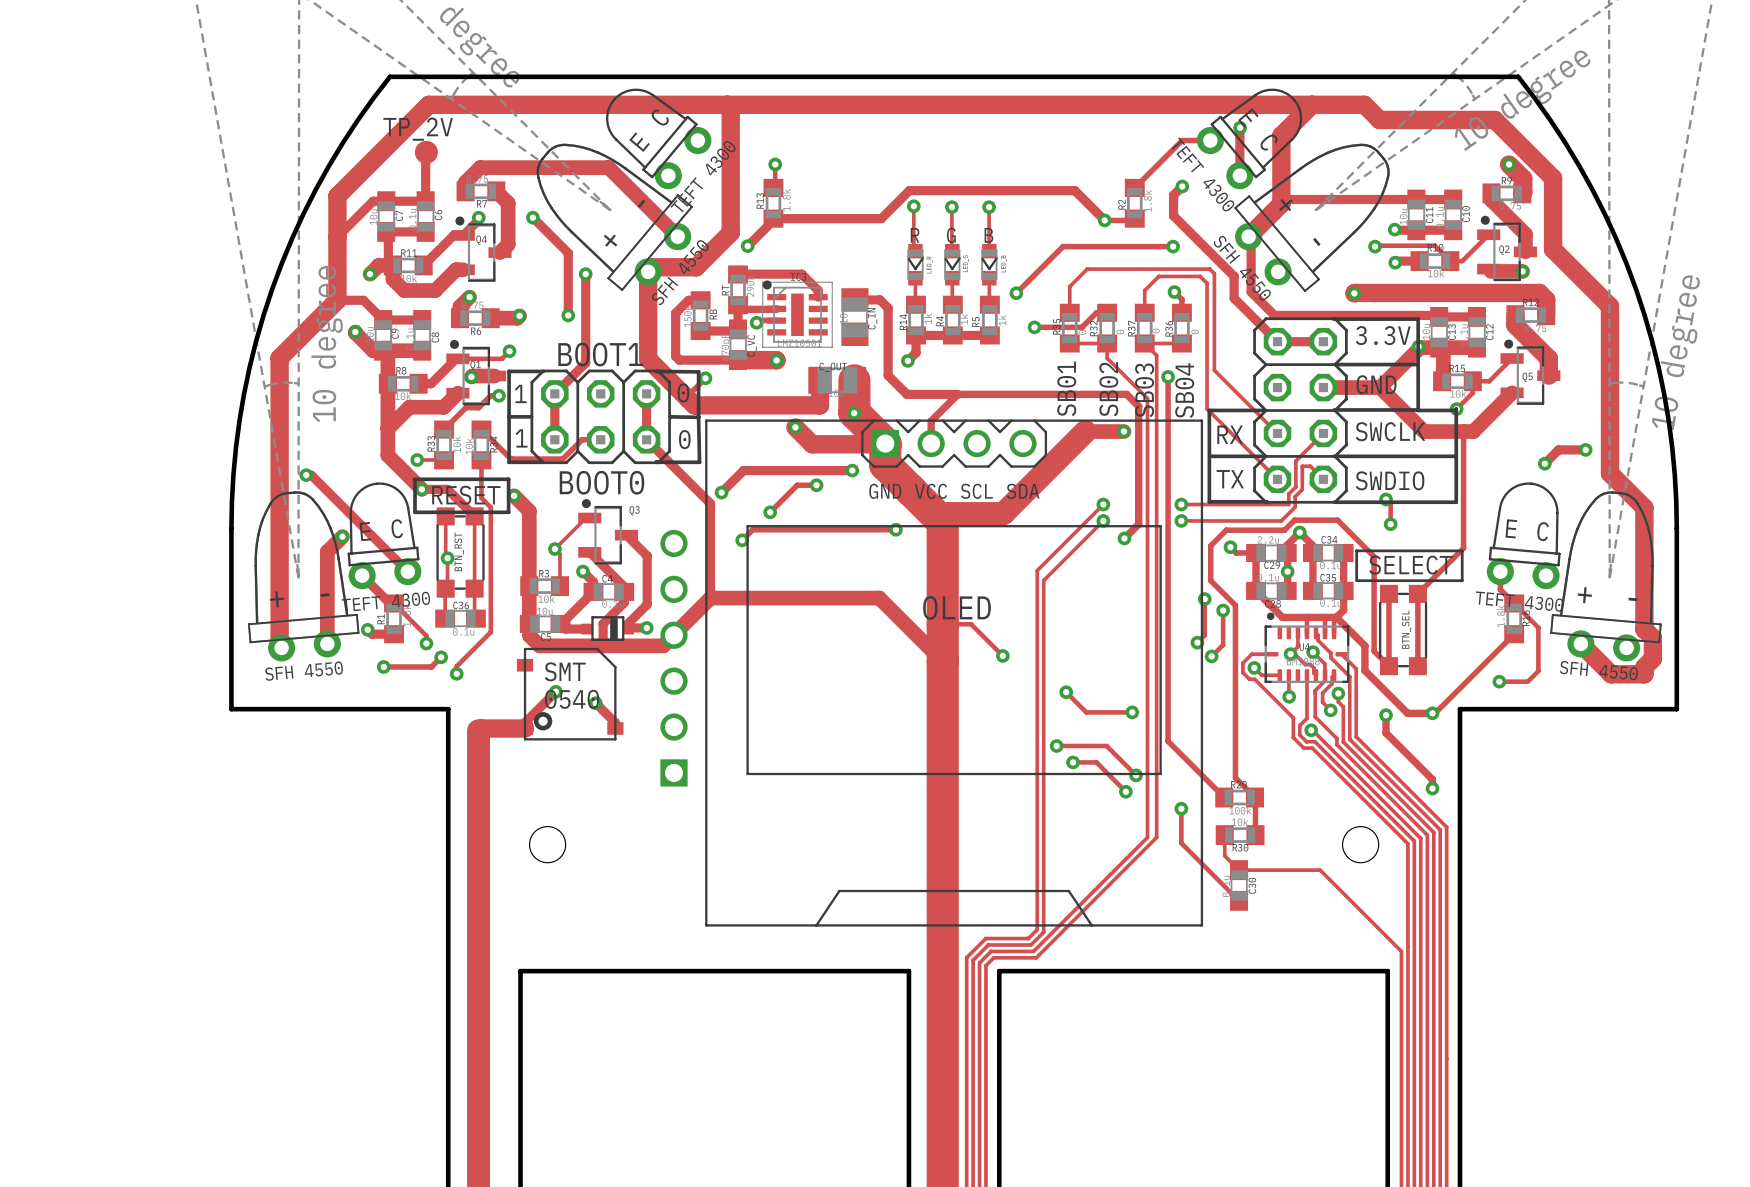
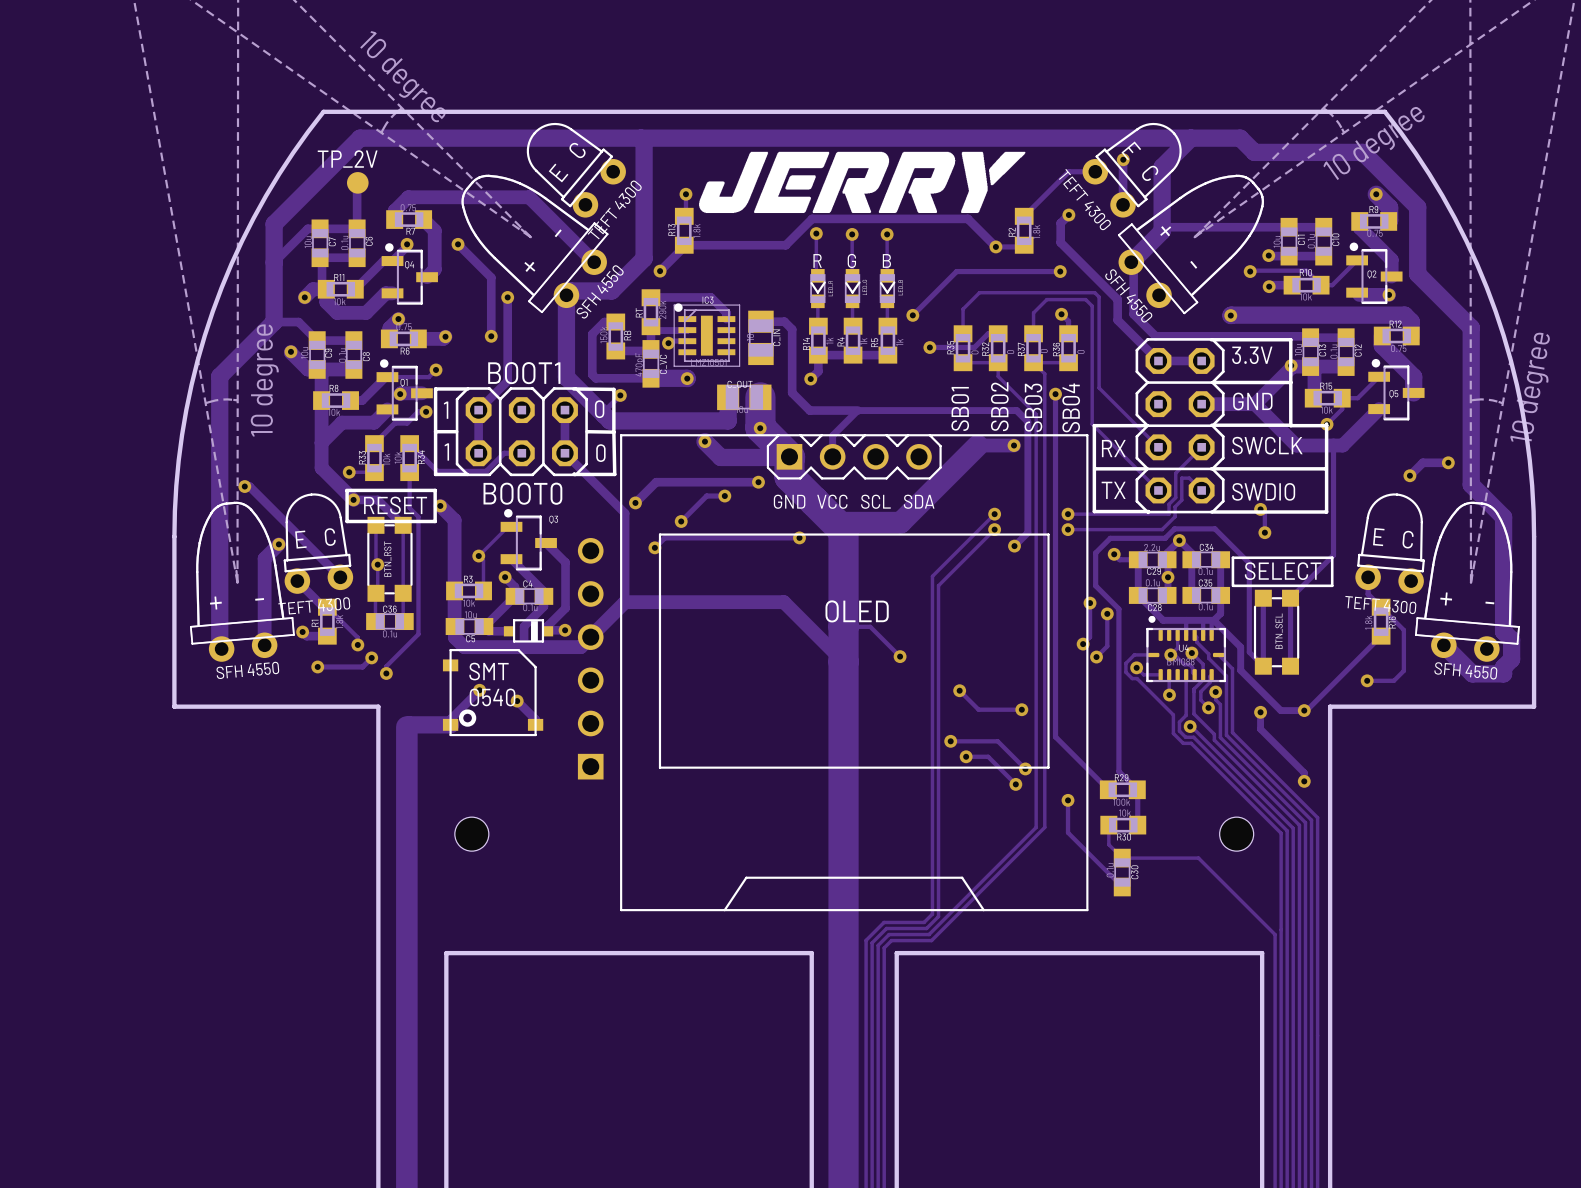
drawing: none -> [699, 151, 1026, 214]

